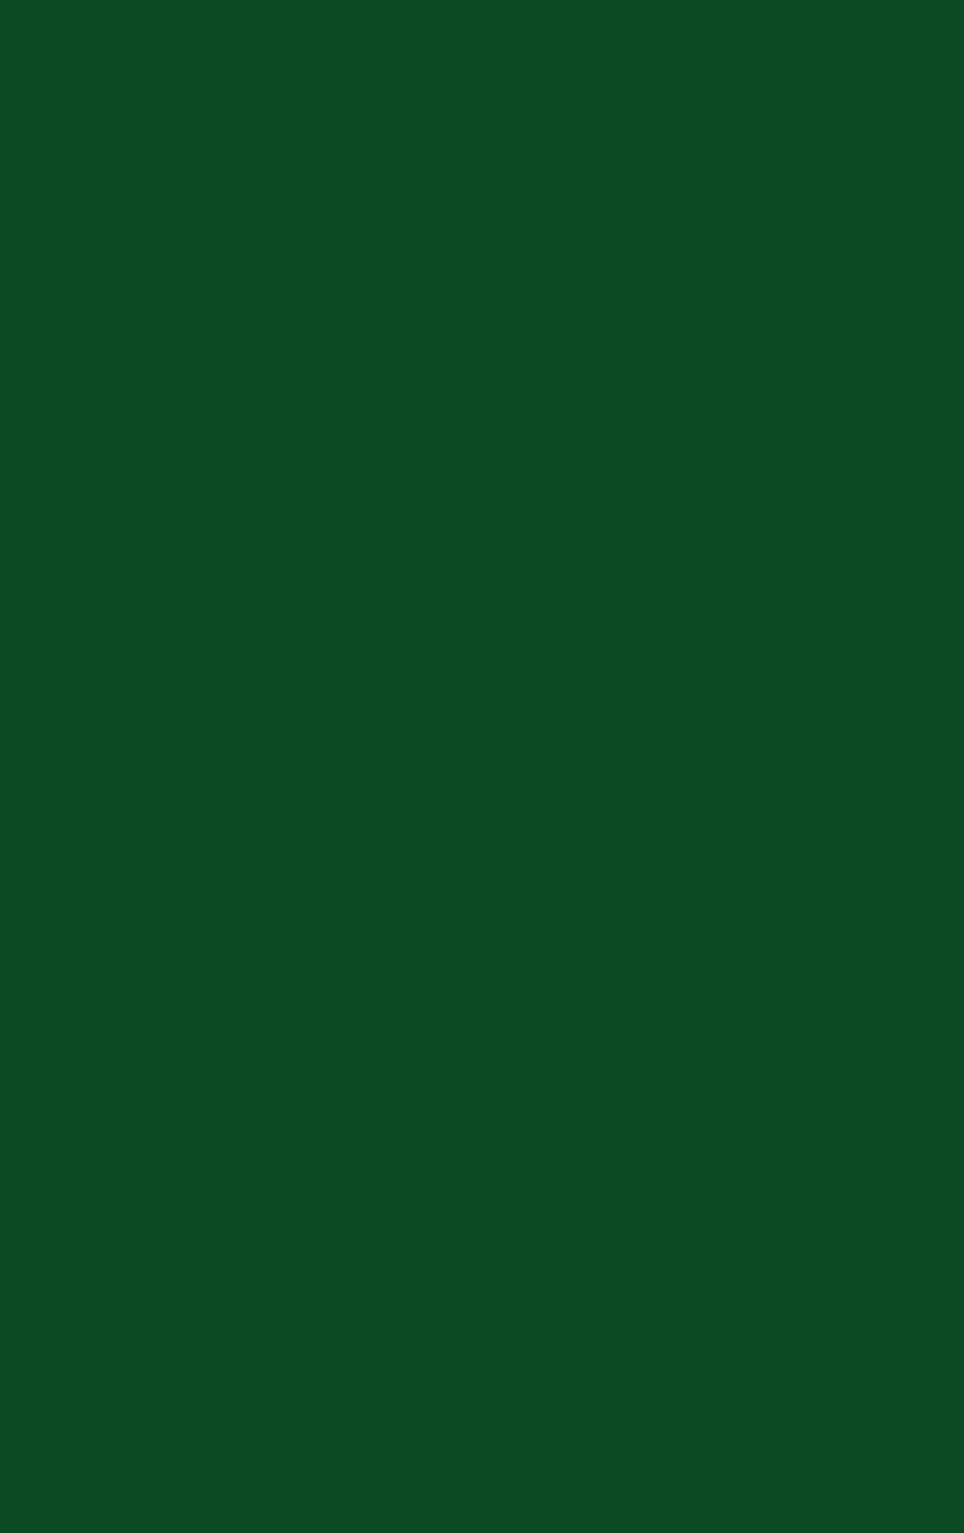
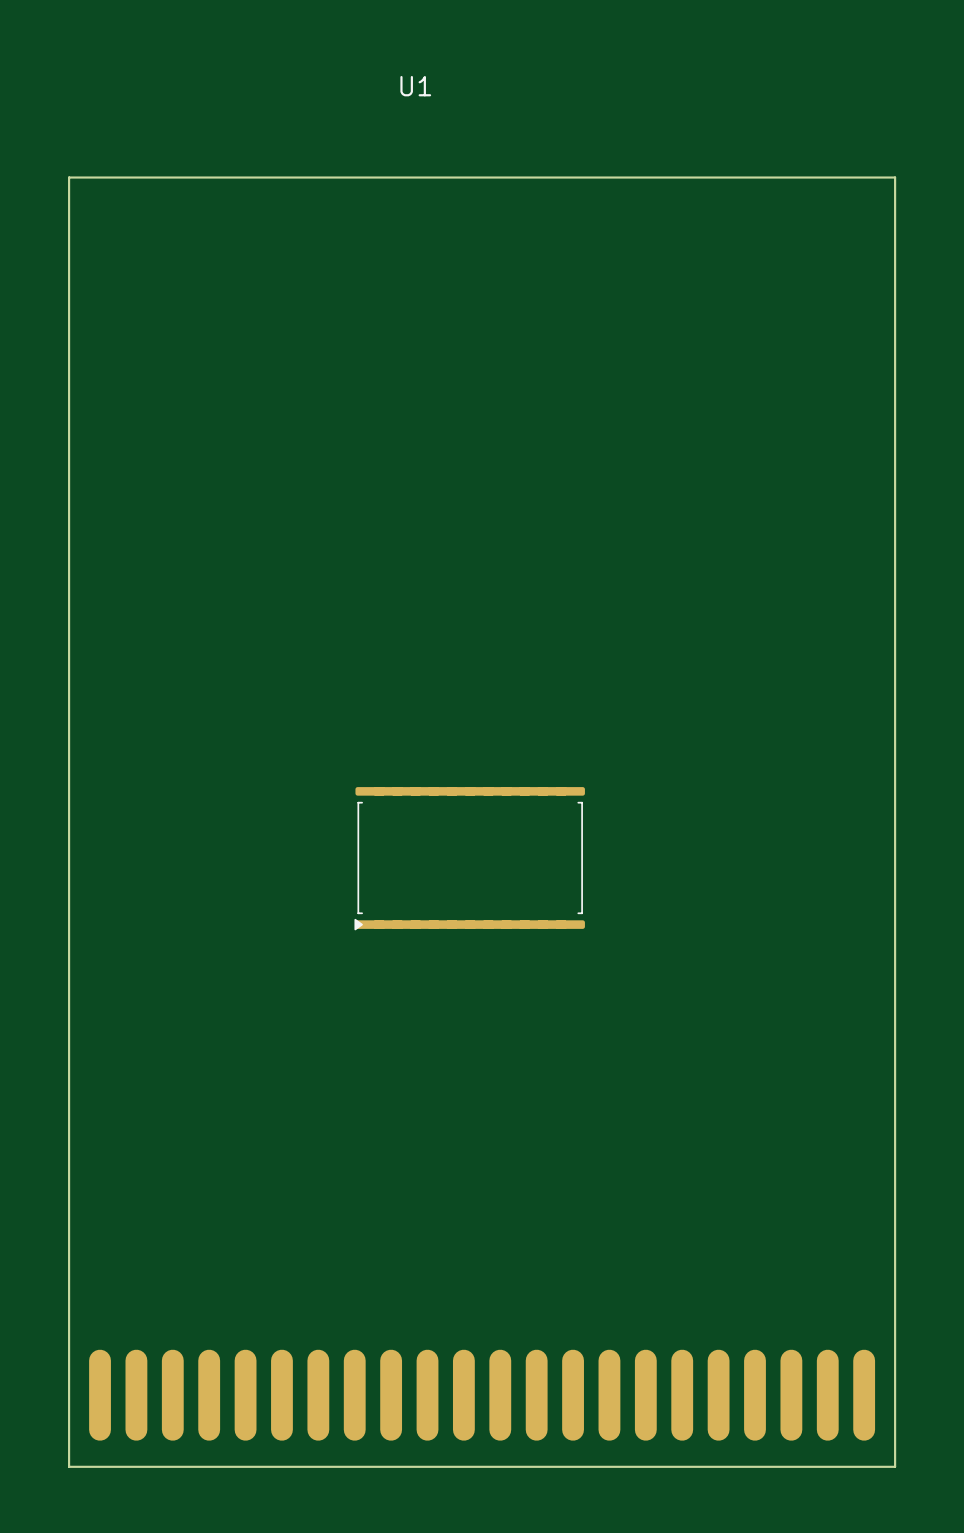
board edge: none -> (895, 177) (69, 177) (69, 1466) (895, 1466) (895, 177)
U1: none -> (469, 858)
part: none -> (482, 1395)

